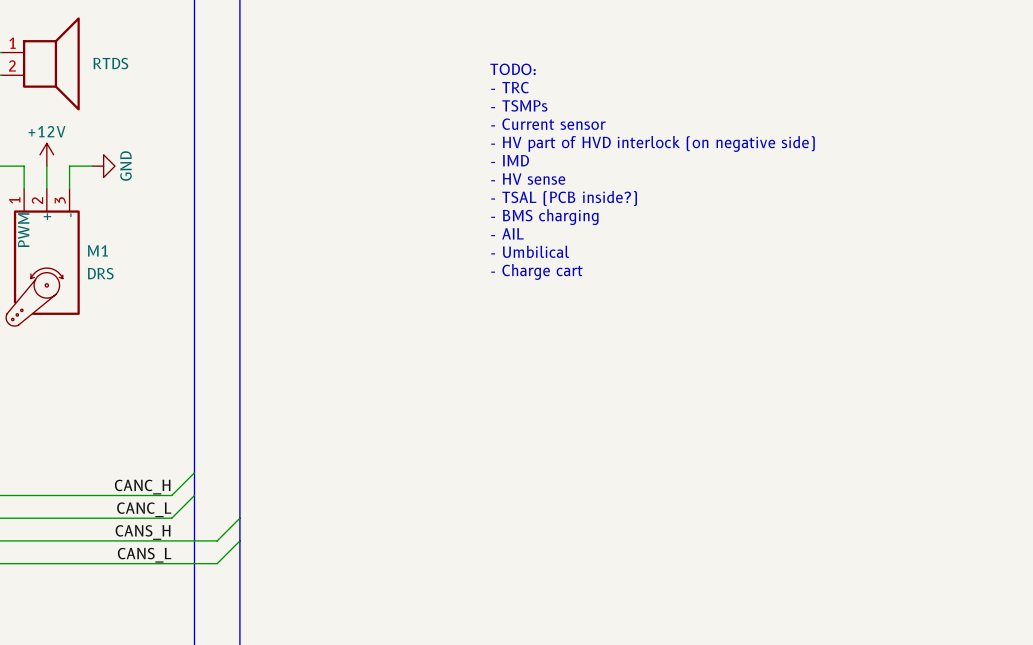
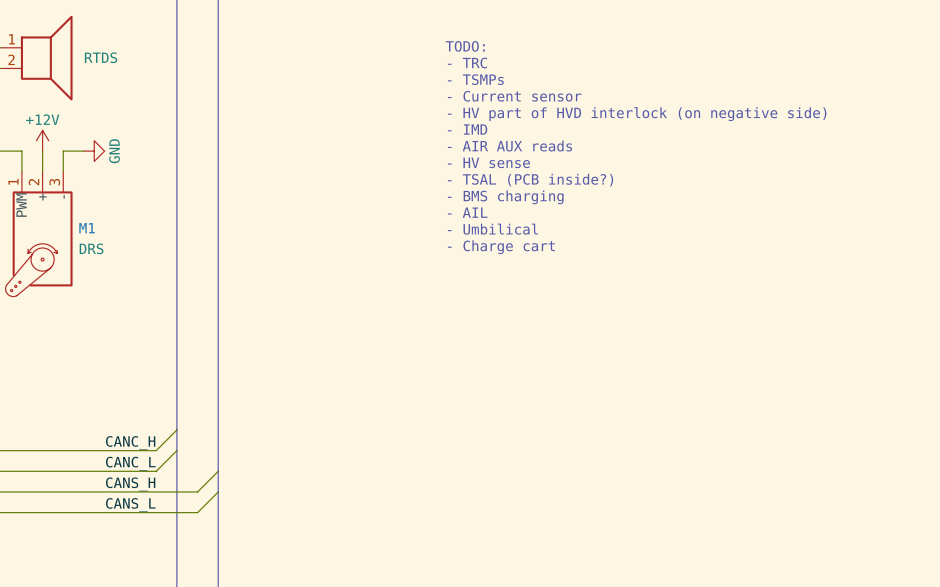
text: none -> TODO: (465, 46)
text: TODO: (513, 69) -> - TRC (467, 63)
text: - TRC (510, 87) -> - TSMPs (475, 79)
text: - TSMPs (519, 105) -> - Current sensor (514, 96)
text: - Current sensor (548, 124) -> - HV part of HVD interlock (on negative side) (637, 114)
text: - HV part of HVD interlock (on negative side) (653, 143) -> - IMD (467, 129)
text: - IMD (510, 160) -> - AIR AUX reads (509, 146)

